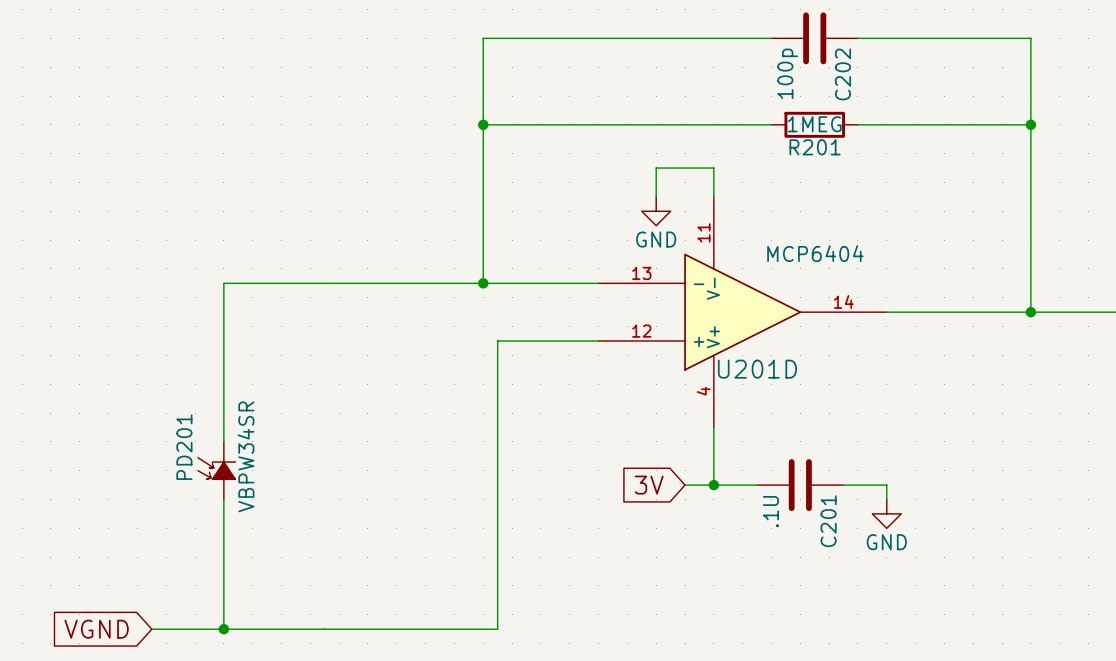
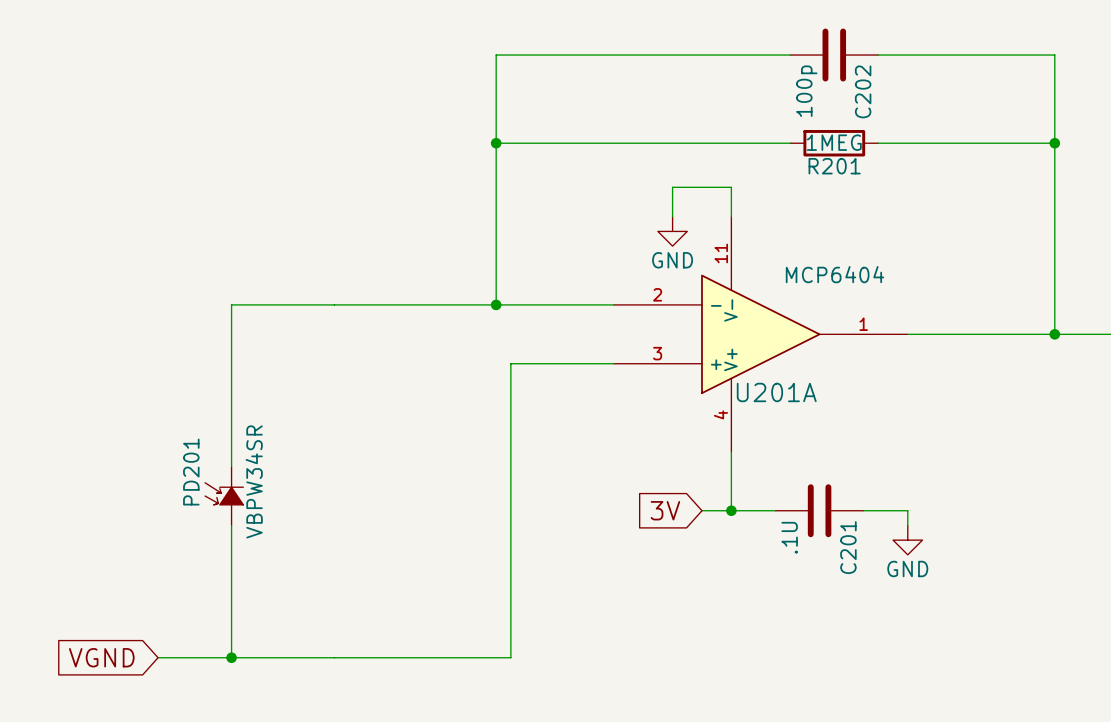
U201D pin number: 13 (641, 273) -> 2 (657, 294)
U201D pin number: 14 (843, 301) -> 1 (863, 324)
U201D pin number: 12 (641, 331) -> 3 (657, 353)
U201D name: U201D (757, 369) -> U201A (776, 392)

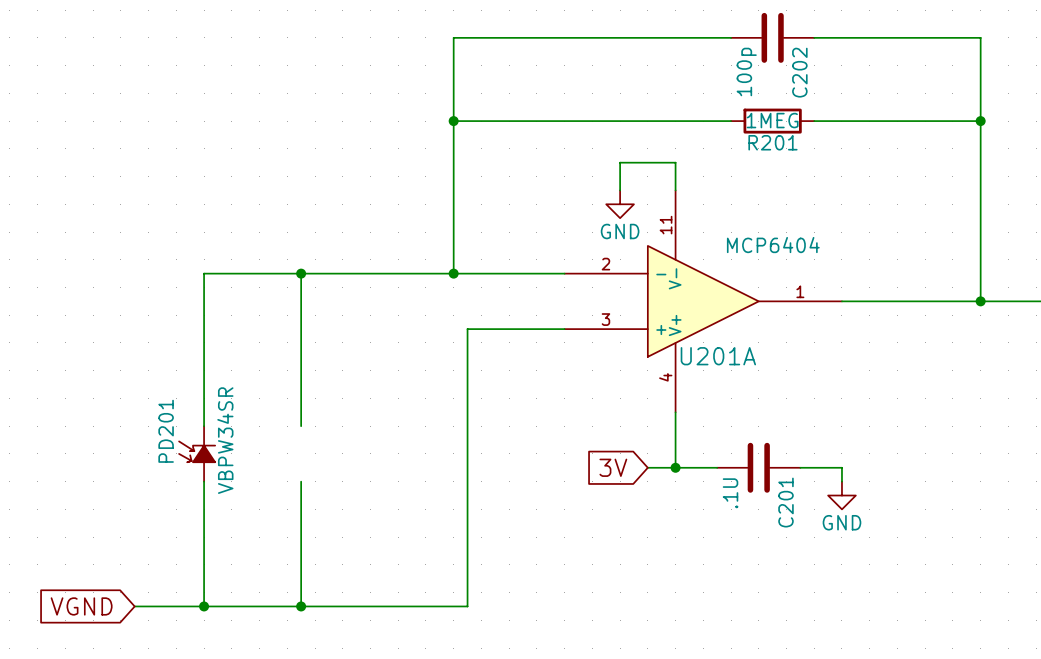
wire: none -> (301, 273) (301, 426)
junction: none -> (301, 273)
wire: none -> (301, 481) (301, 606)
junction: none -> (301, 606)

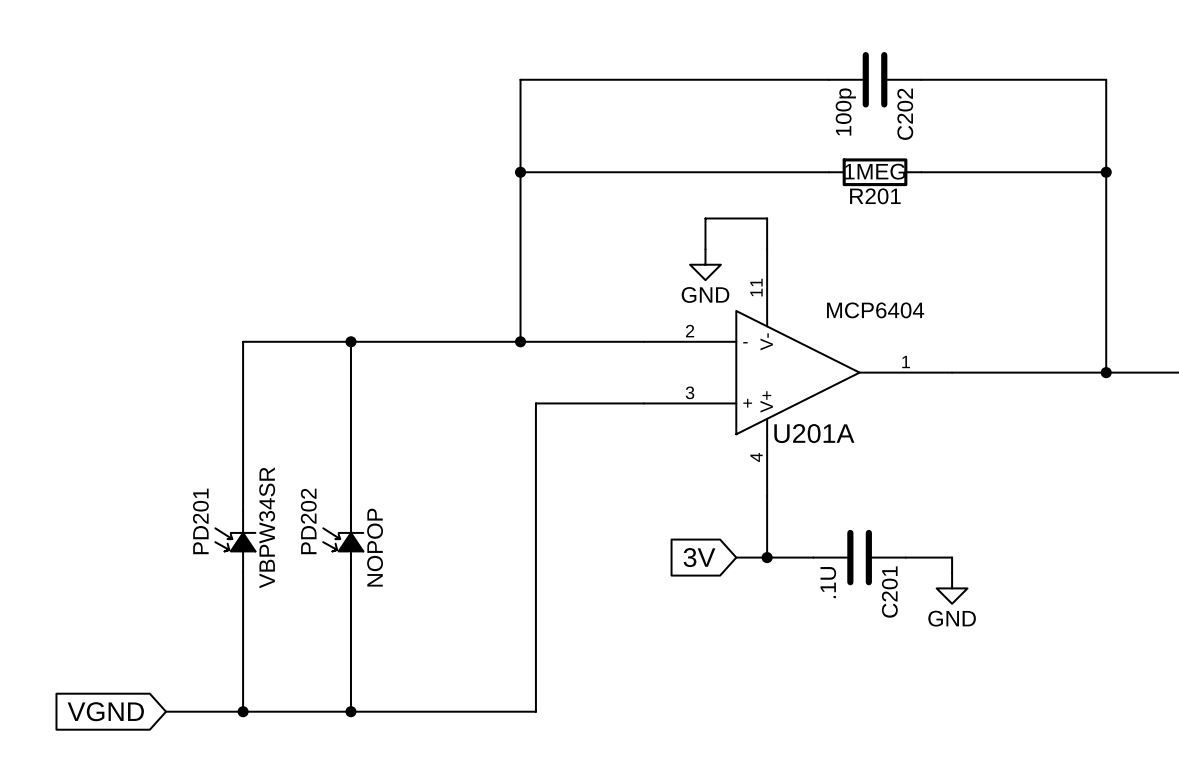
PD202: none -> NOPOP (343, 542)

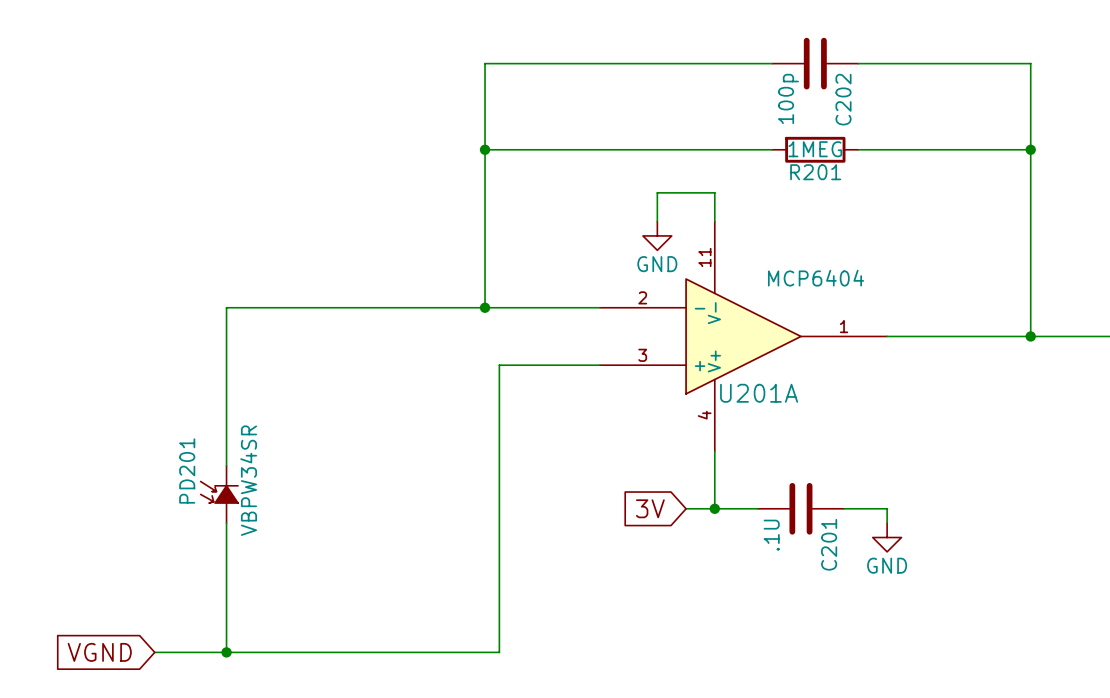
wire: (350, 341) (350, 511) -> none
junction: (350, 341) -> none
PD202: NOPOP (343, 542) -> none
wire: (350, 572) (350, 711) -> none
junction: (350, 711) -> none

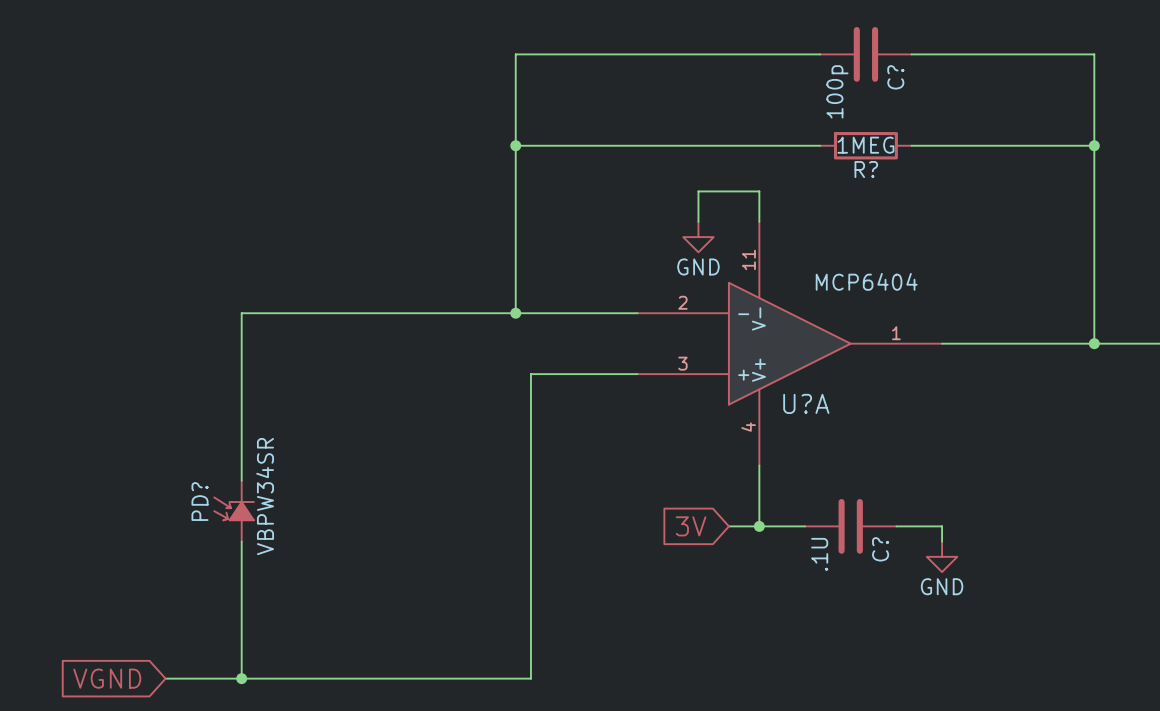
C202 name: C202 (843, 99) -> C? (895, 77)
R201 name: R201 (815, 172) -> R? (866, 169)
U201A name: U201A (759, 393) -> U?A (806, 403)
PD201 name: PD201 (187, 471) -> PD? (200, 501)
C201 name: C201 (829, 544) -> C? (880, 549)

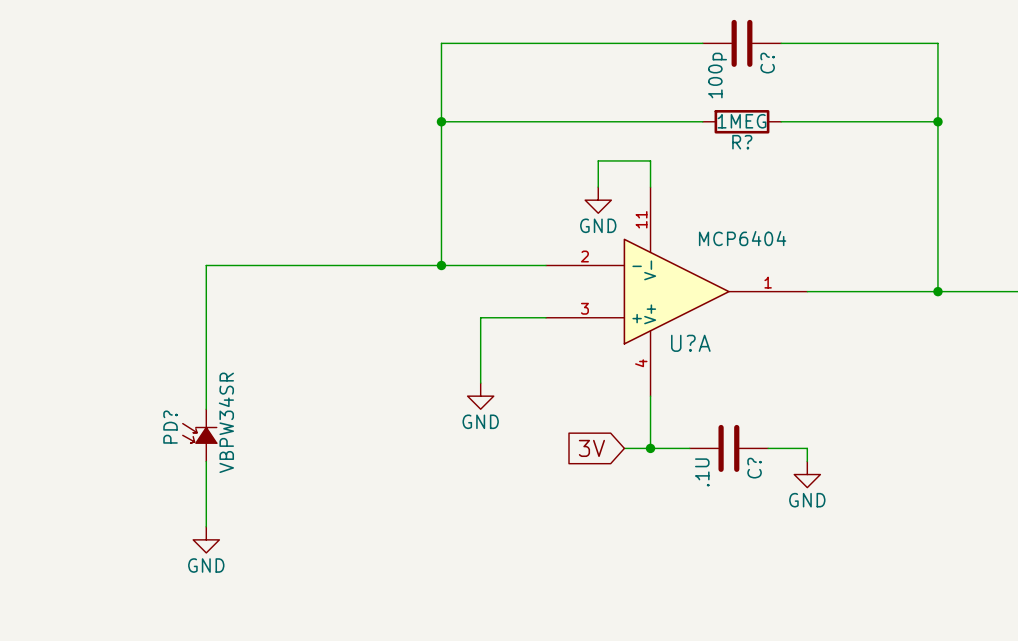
wire: (561, 374) (530, 374) (530, 678) (165, 678) -> (480, 317) (480, 383)
power symbol: none -> GND (480, 396)
wire: (241, 617) (241, 678) -> none
power symbol: none -> GND (206, 539)
global label: VGND (107, 678) -> none
junction: (241, 678) -> none

